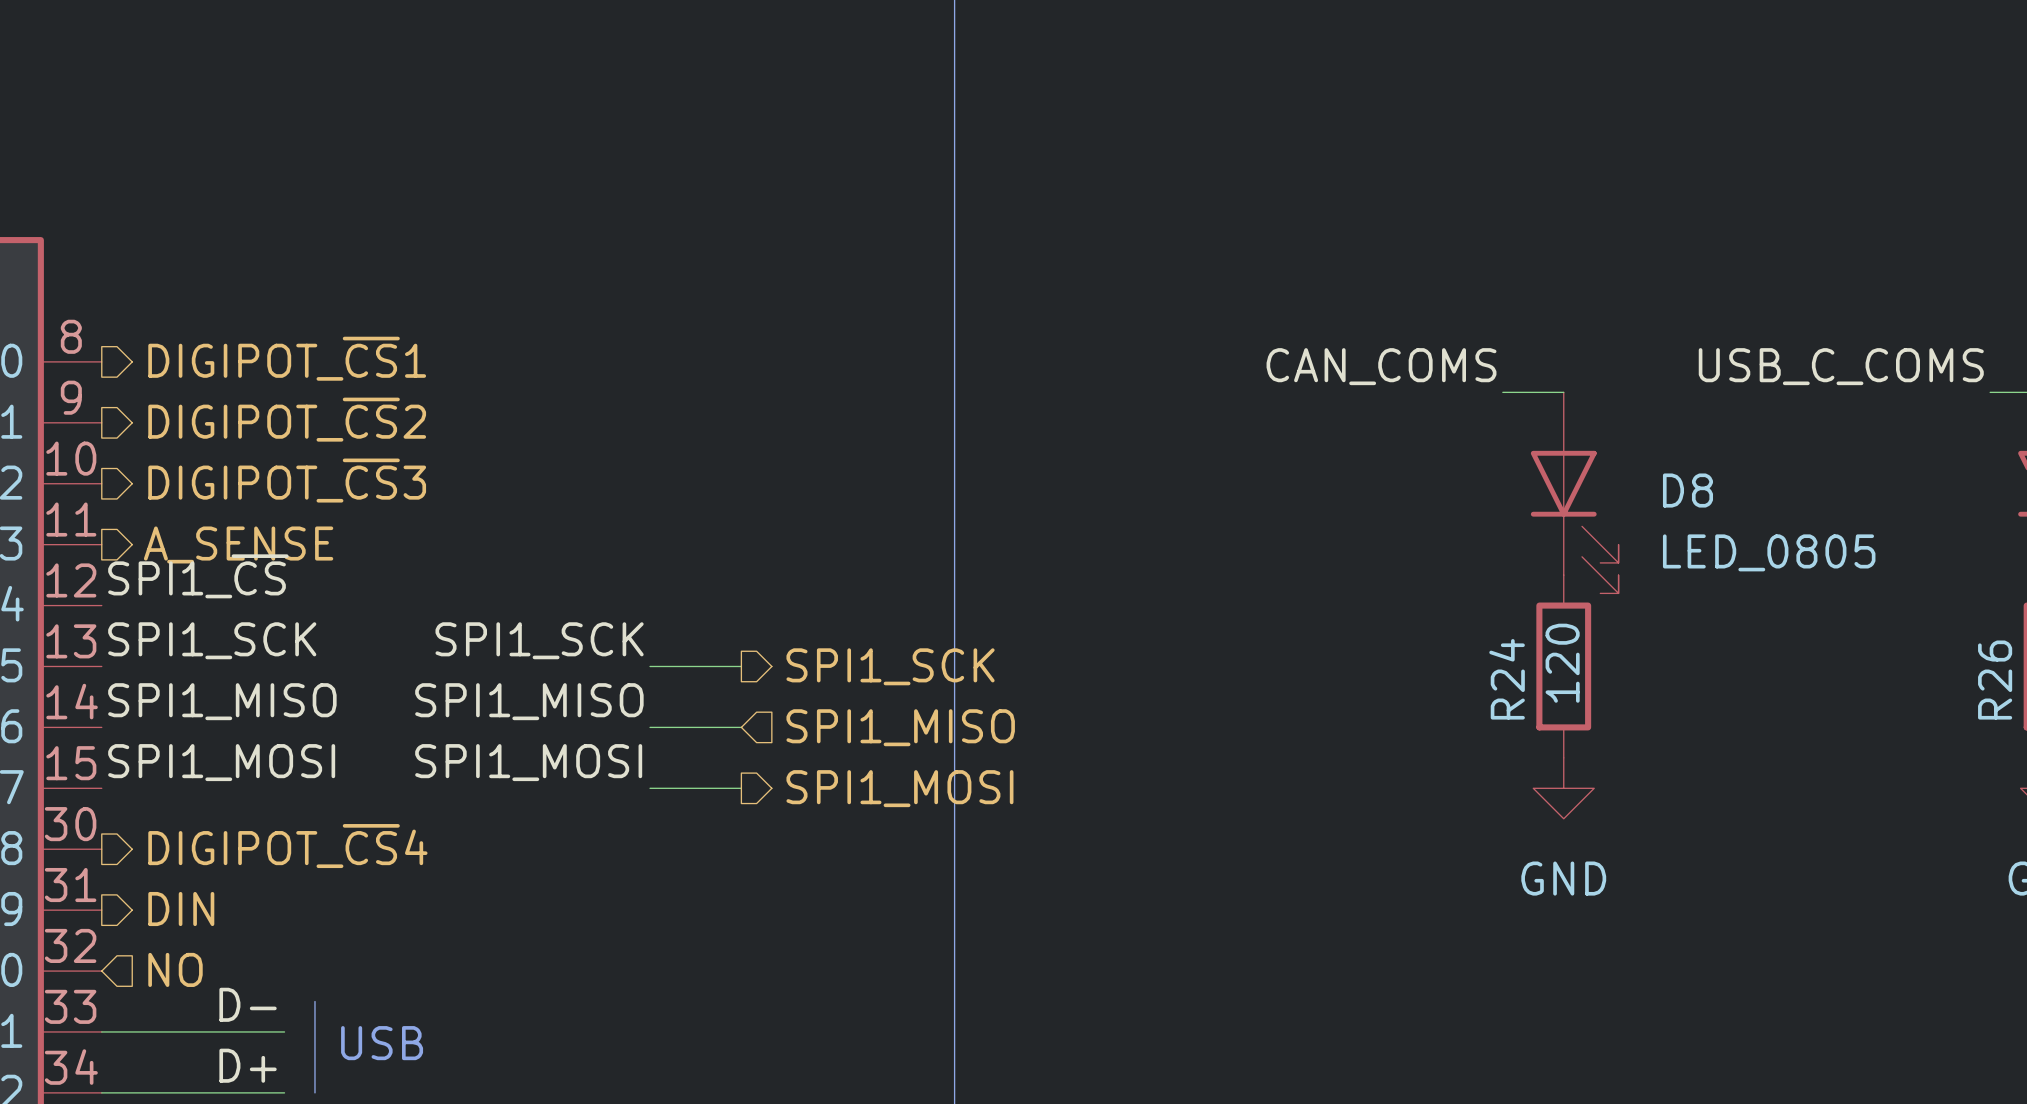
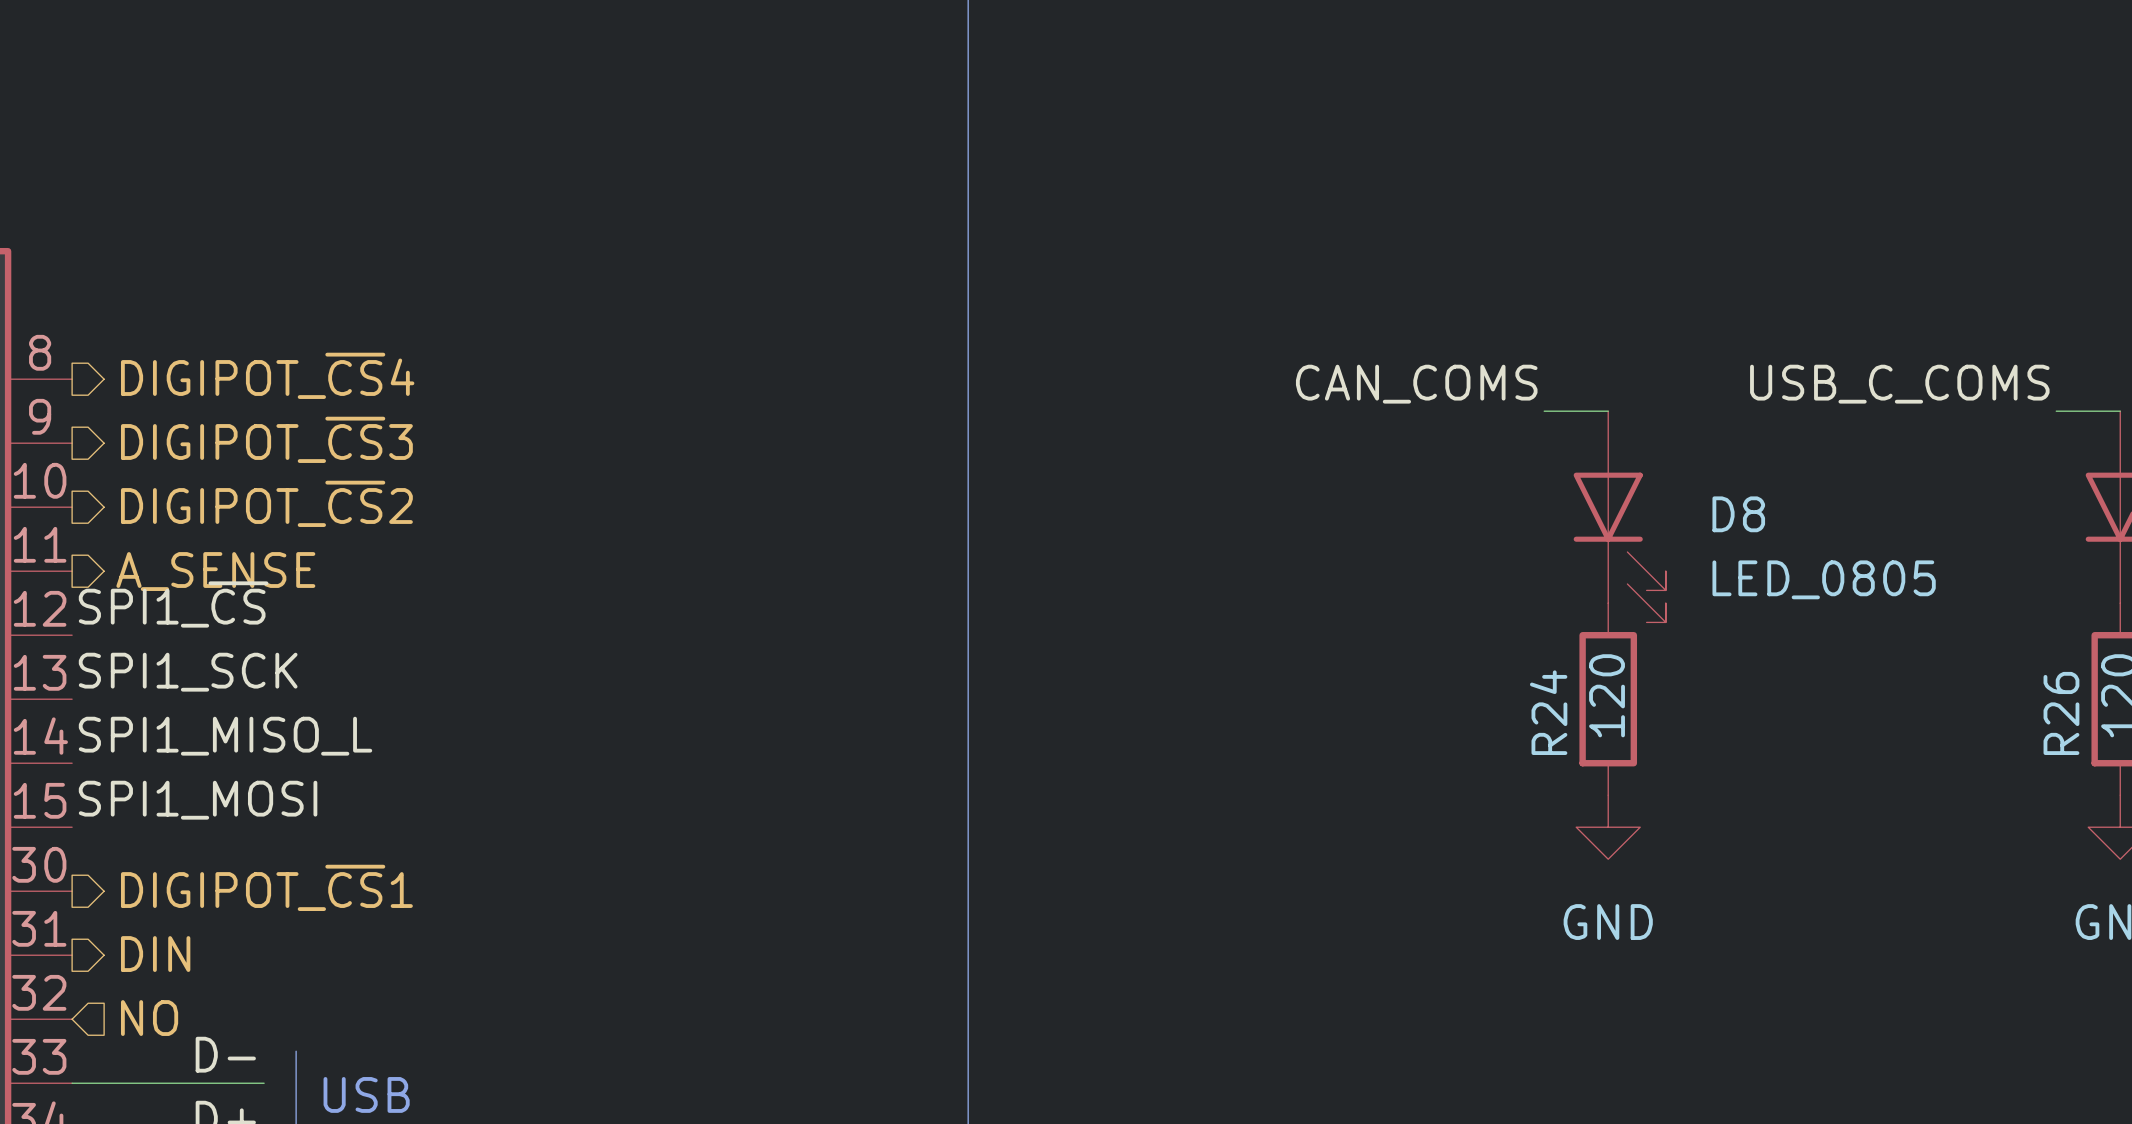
hierarchical label: DIGIPOT_~{CS}1 (287, 358) -> DIGIPOT_~{CS}4 (267, 375)
hierarchical label: DIGIPOT_~{CS}2 (287, 419) -> DIGIPOT_~{CS}3 (266, 439)
hierarchical label: DIGIPOT_~{CS}3 (287, 480) -> DIGIPOT_~{CS}2 (266, 503)
label: SPI1_SCK (539, 640) -> none
wire: (650, 666) (741, 666) -> none
hierarchical label: SPI1_SCK (890, 666) -> none
label: SPI1_MISO (222, 701) -> SPI1_MISO_L (225, 736)
label: SPI1_MISO (529, 701) -> none
wire: (650, 727) (741, 727) -> none
hierarchical label: SPI1_MISO (900, 727) -> none
label: SPI1_MOSI (528, 762) -> none
wire: (650, 788) (741, 788) -> none
hierarchical label: SPI1_MOSI (899, 788) -> none
hierarchical label: DIGIPOT_~{CS}4 (287, 846) -> DIGIPOT_~{CS}1 (266, 887)

